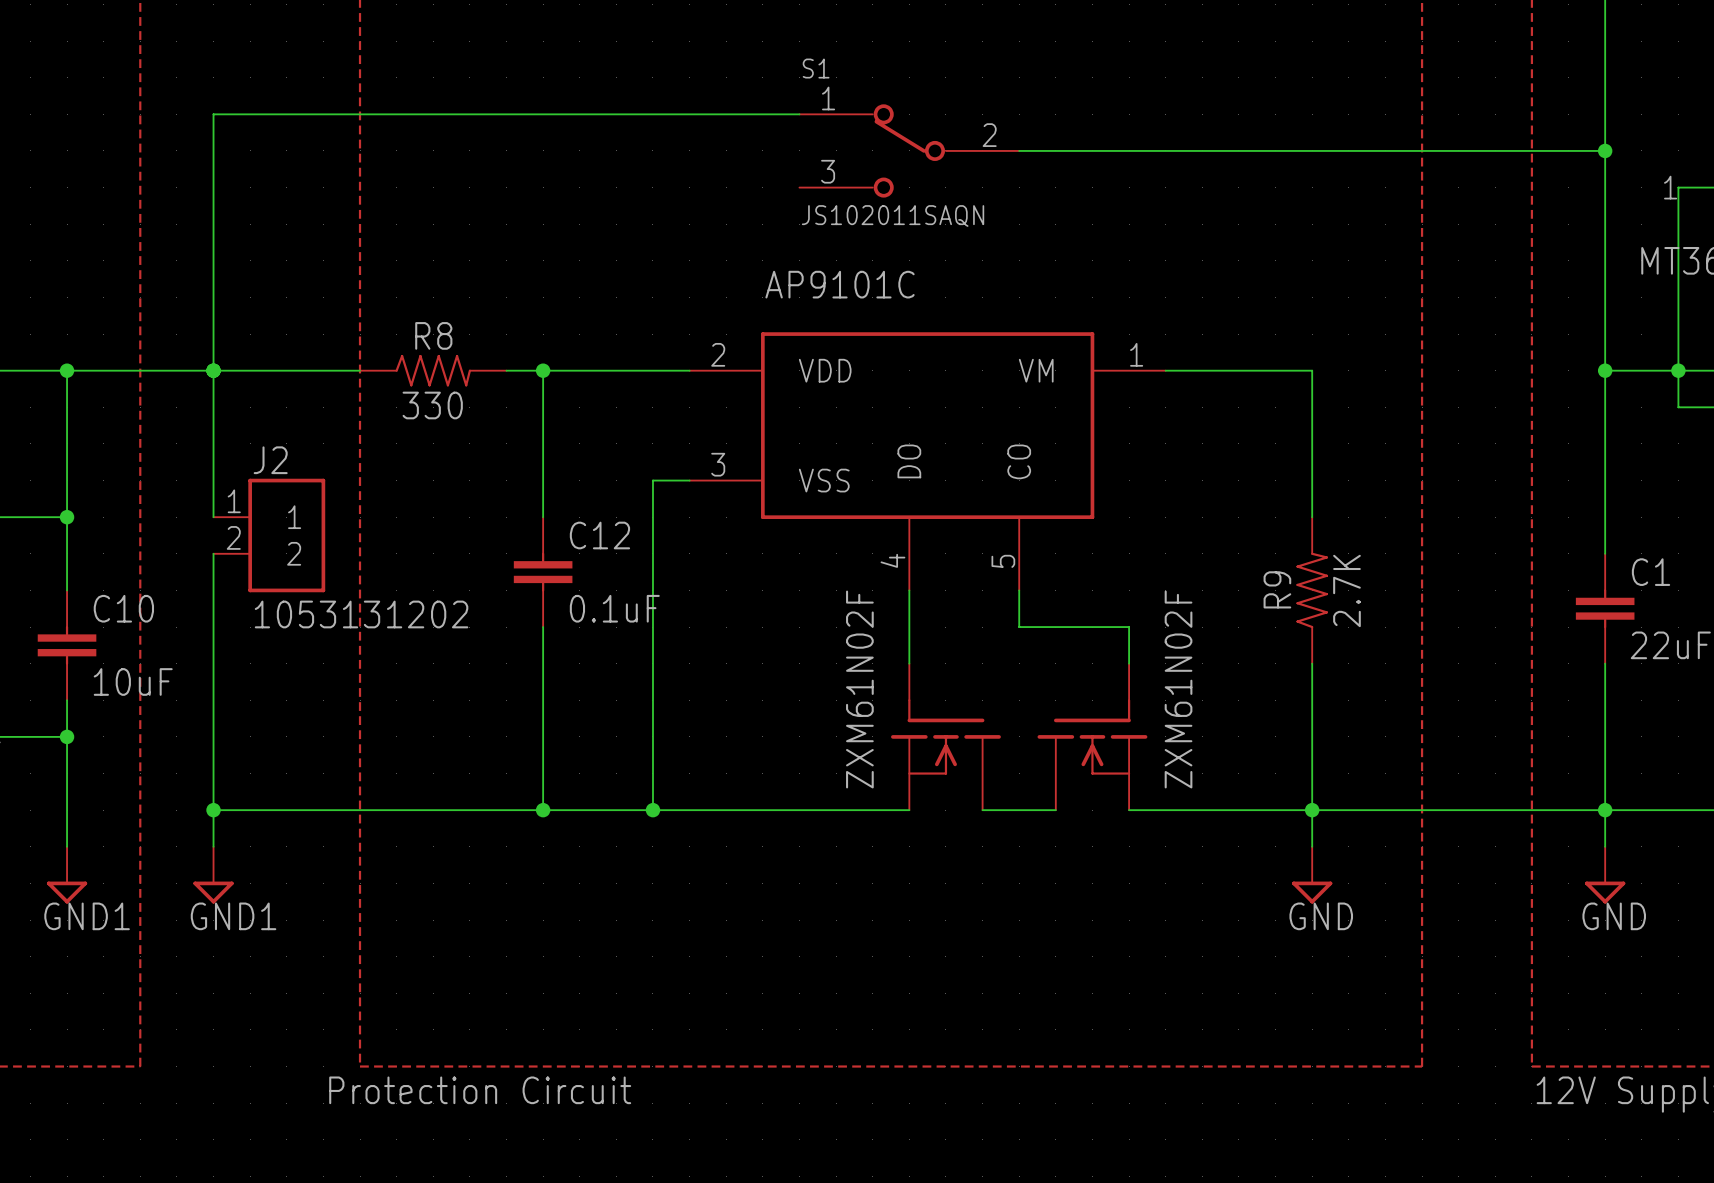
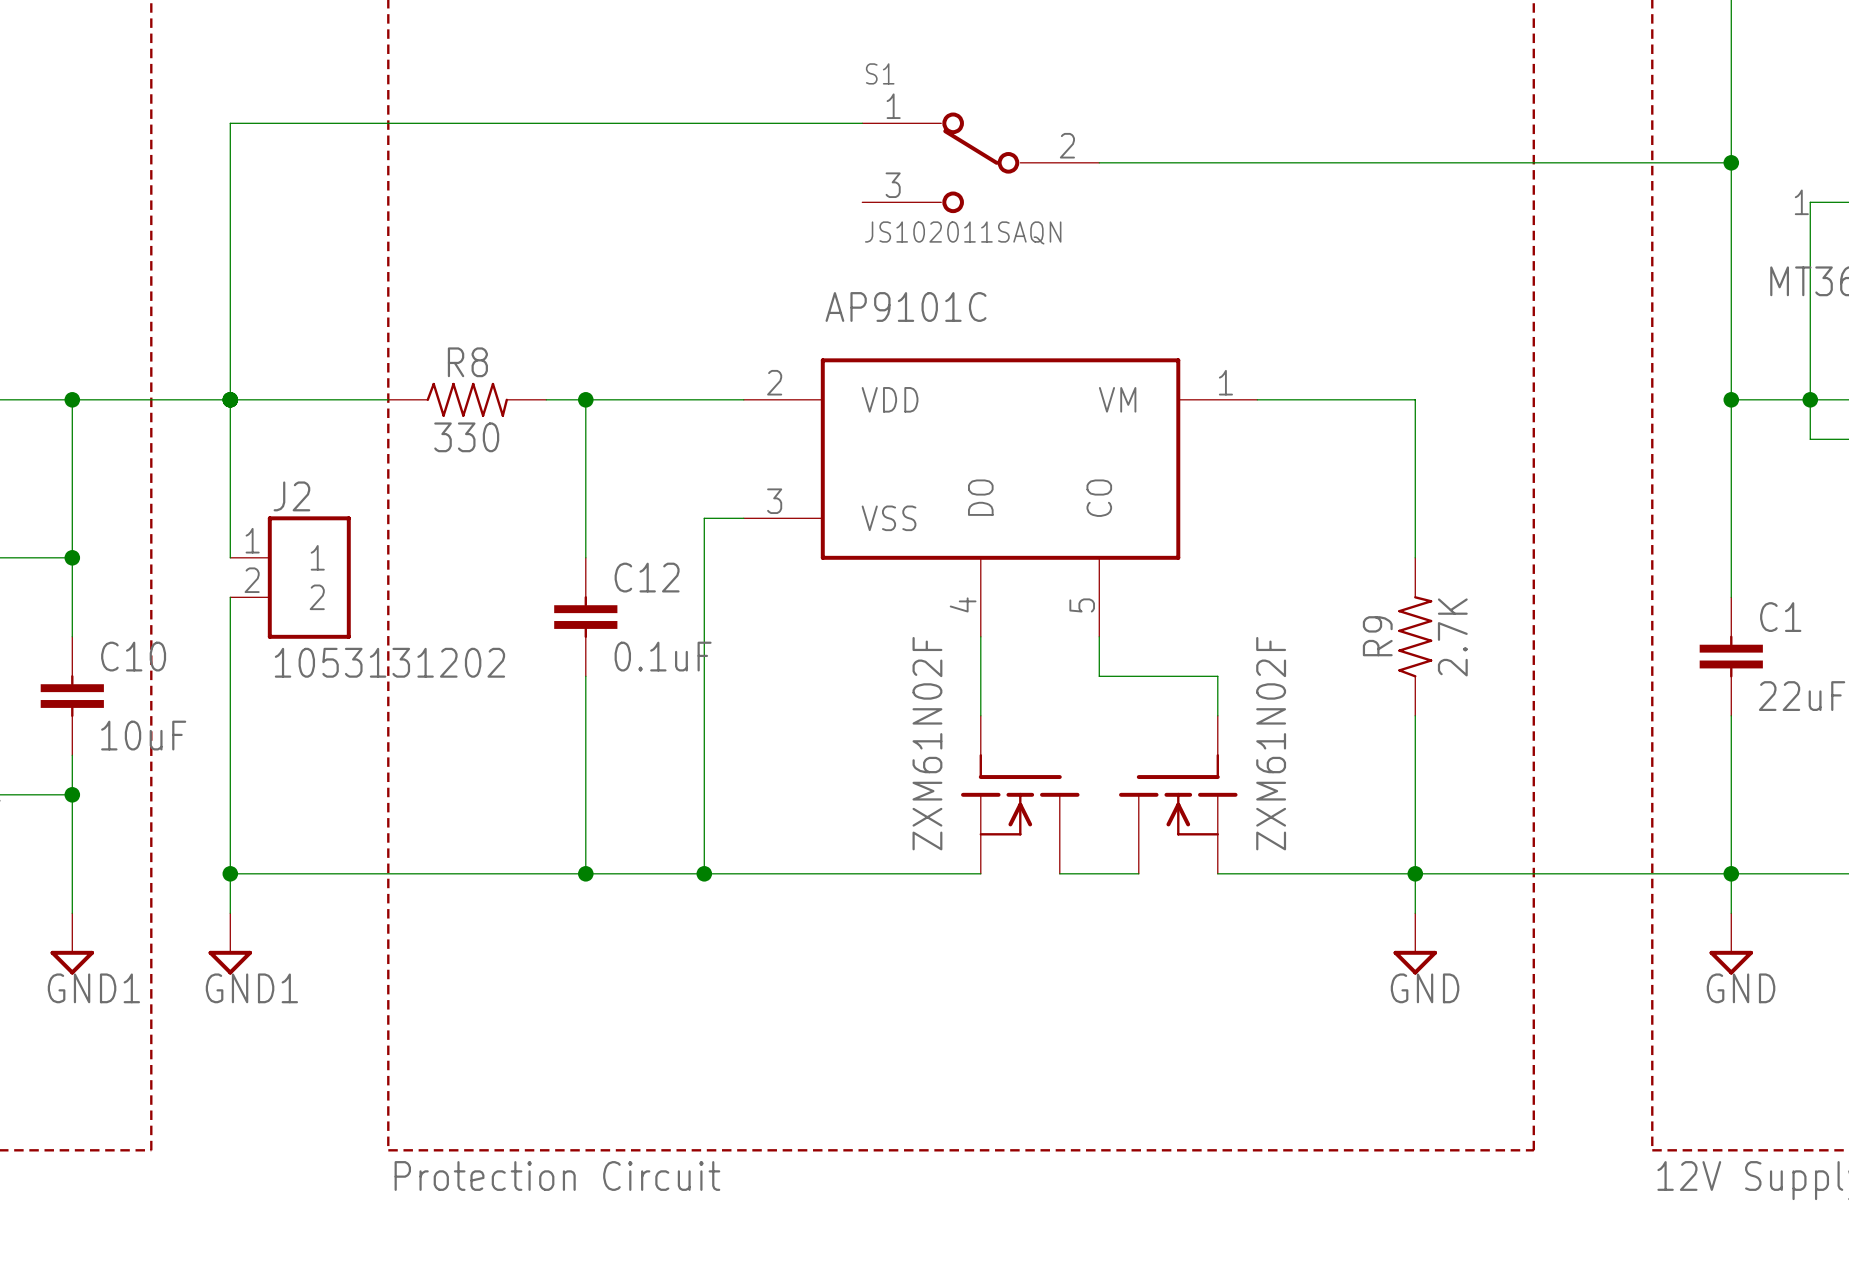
text position: Protection Circuit (480, 1090) -> Protection Circuit (557, 1175)

